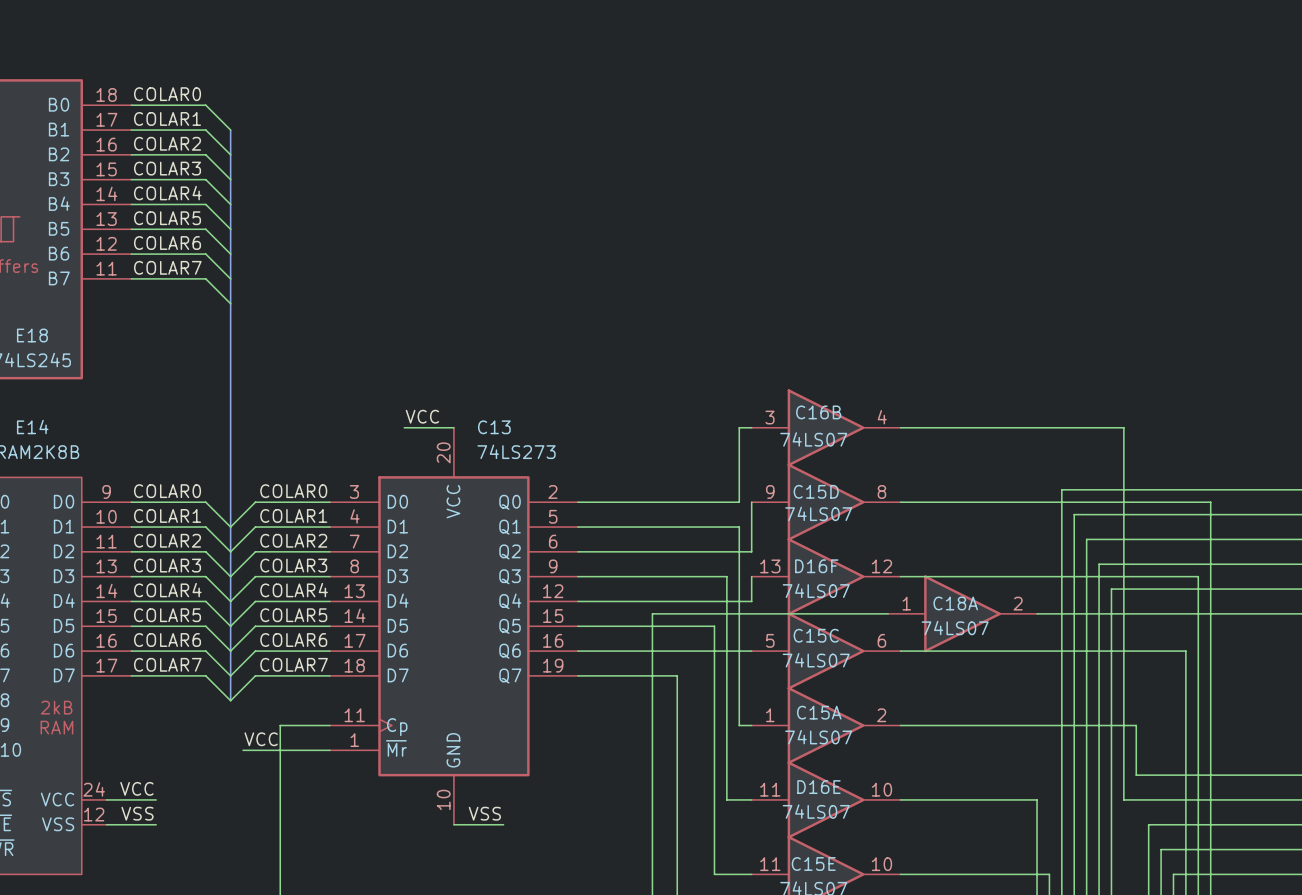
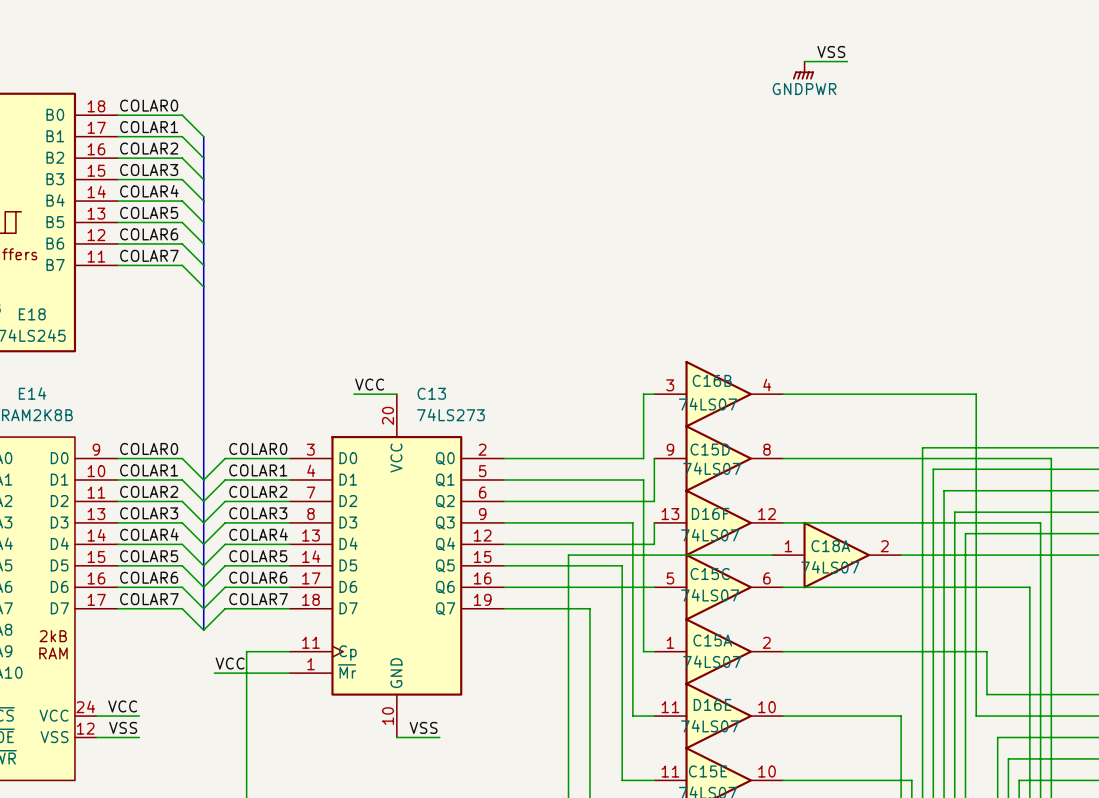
label: none -> VSS (831, 51)
wire: none -> (804, 61) (847, 61)
power symbol: none -> GNDPWR (803, 70)

